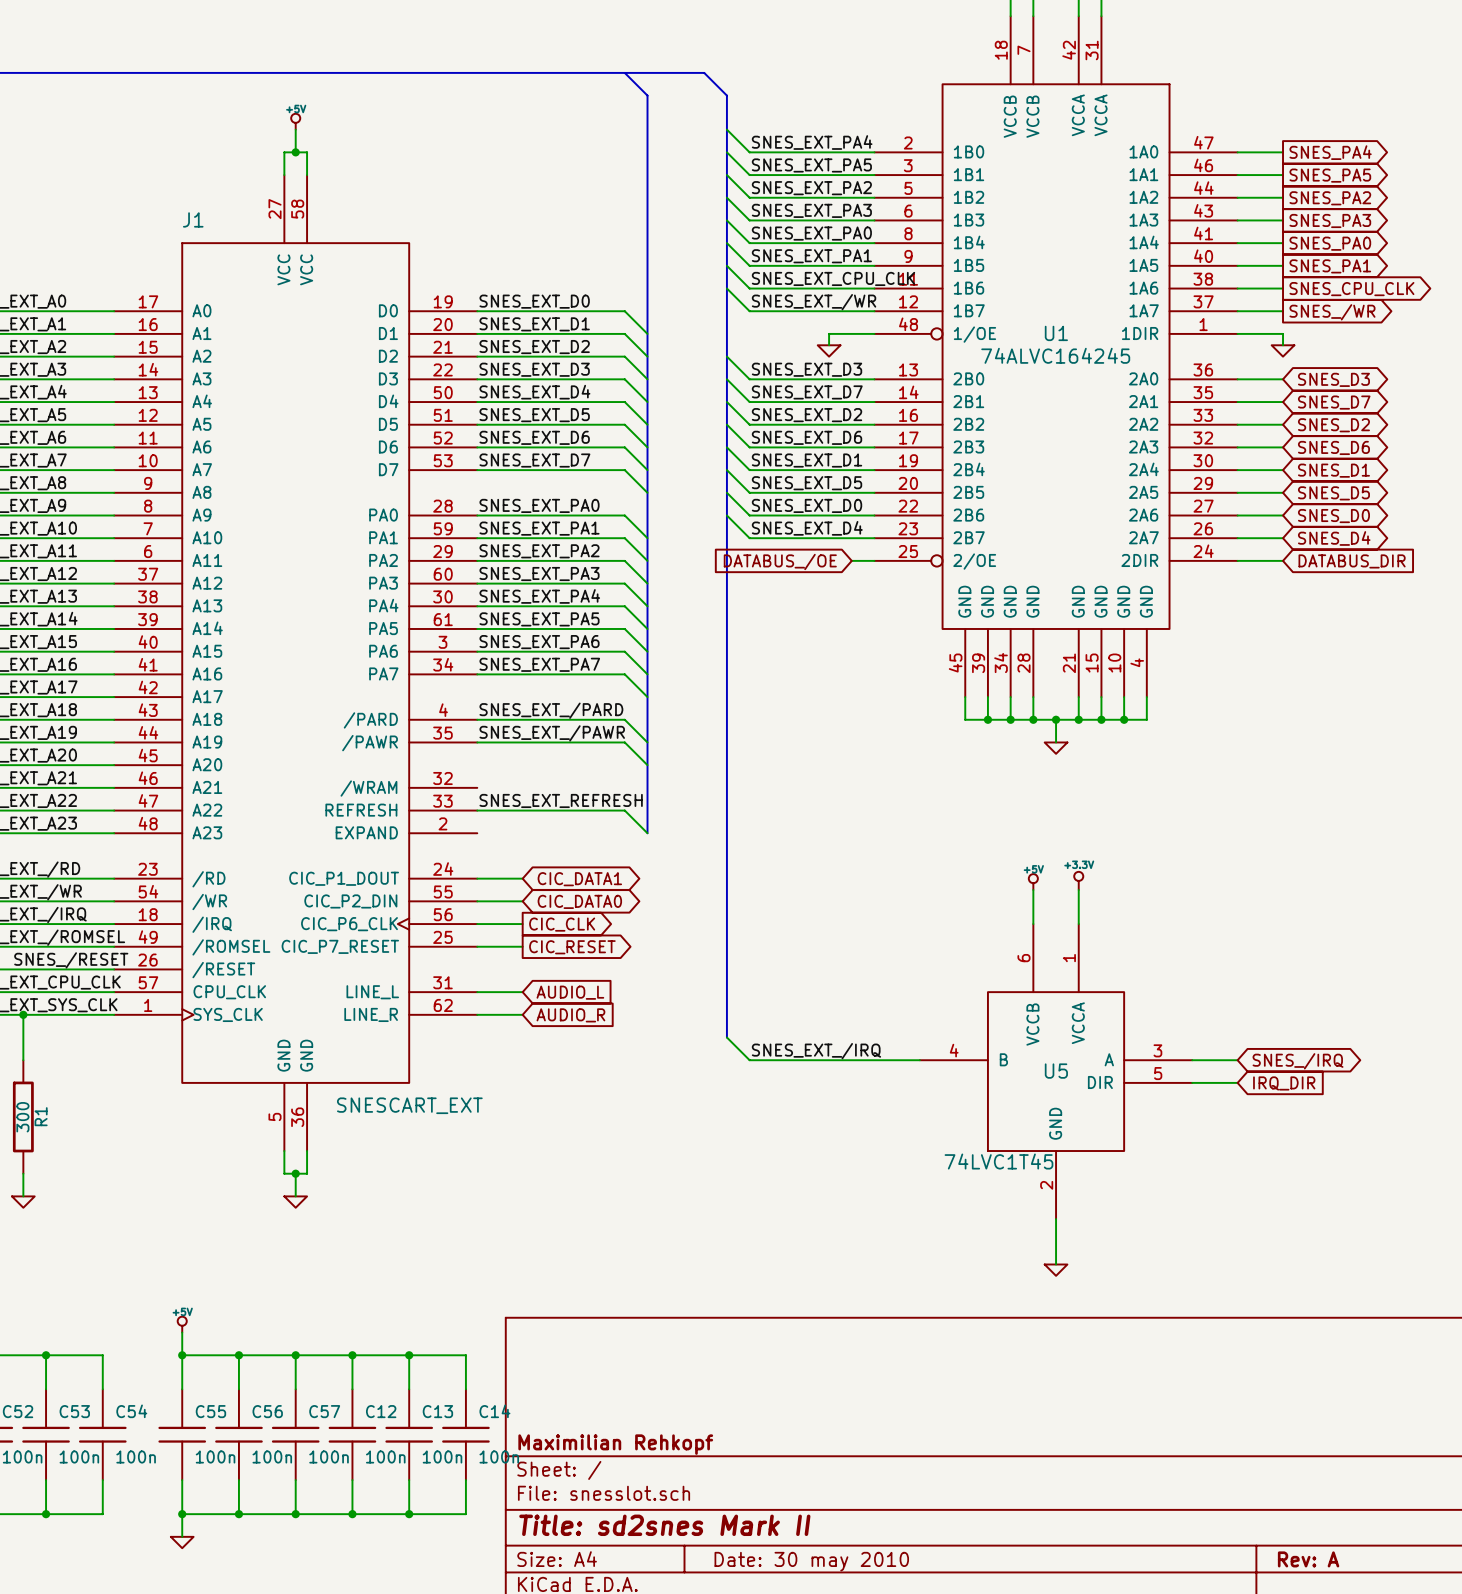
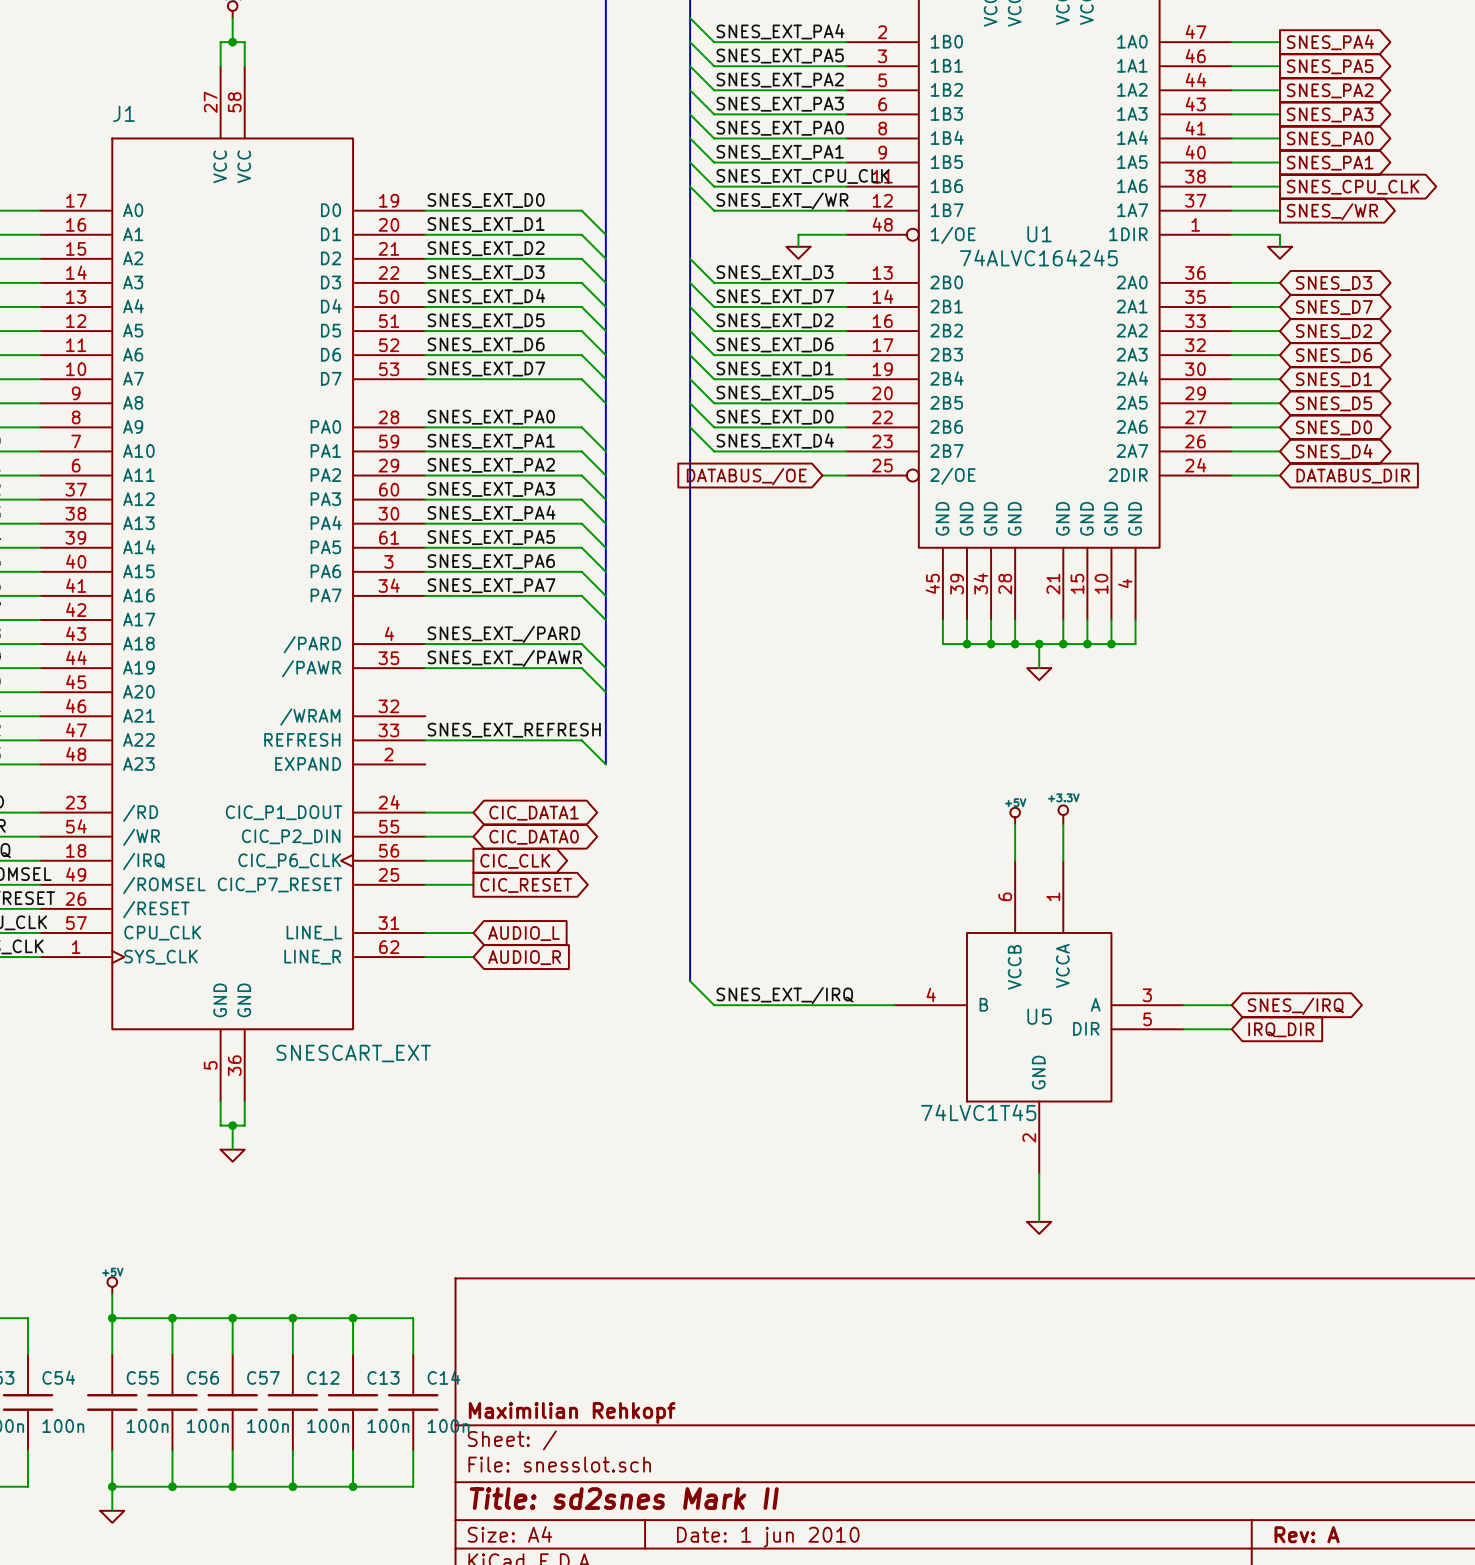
title block: Date: 30 may 2010 (811, 1561) -> Date: 1 jun 2010 (768, 1537)

